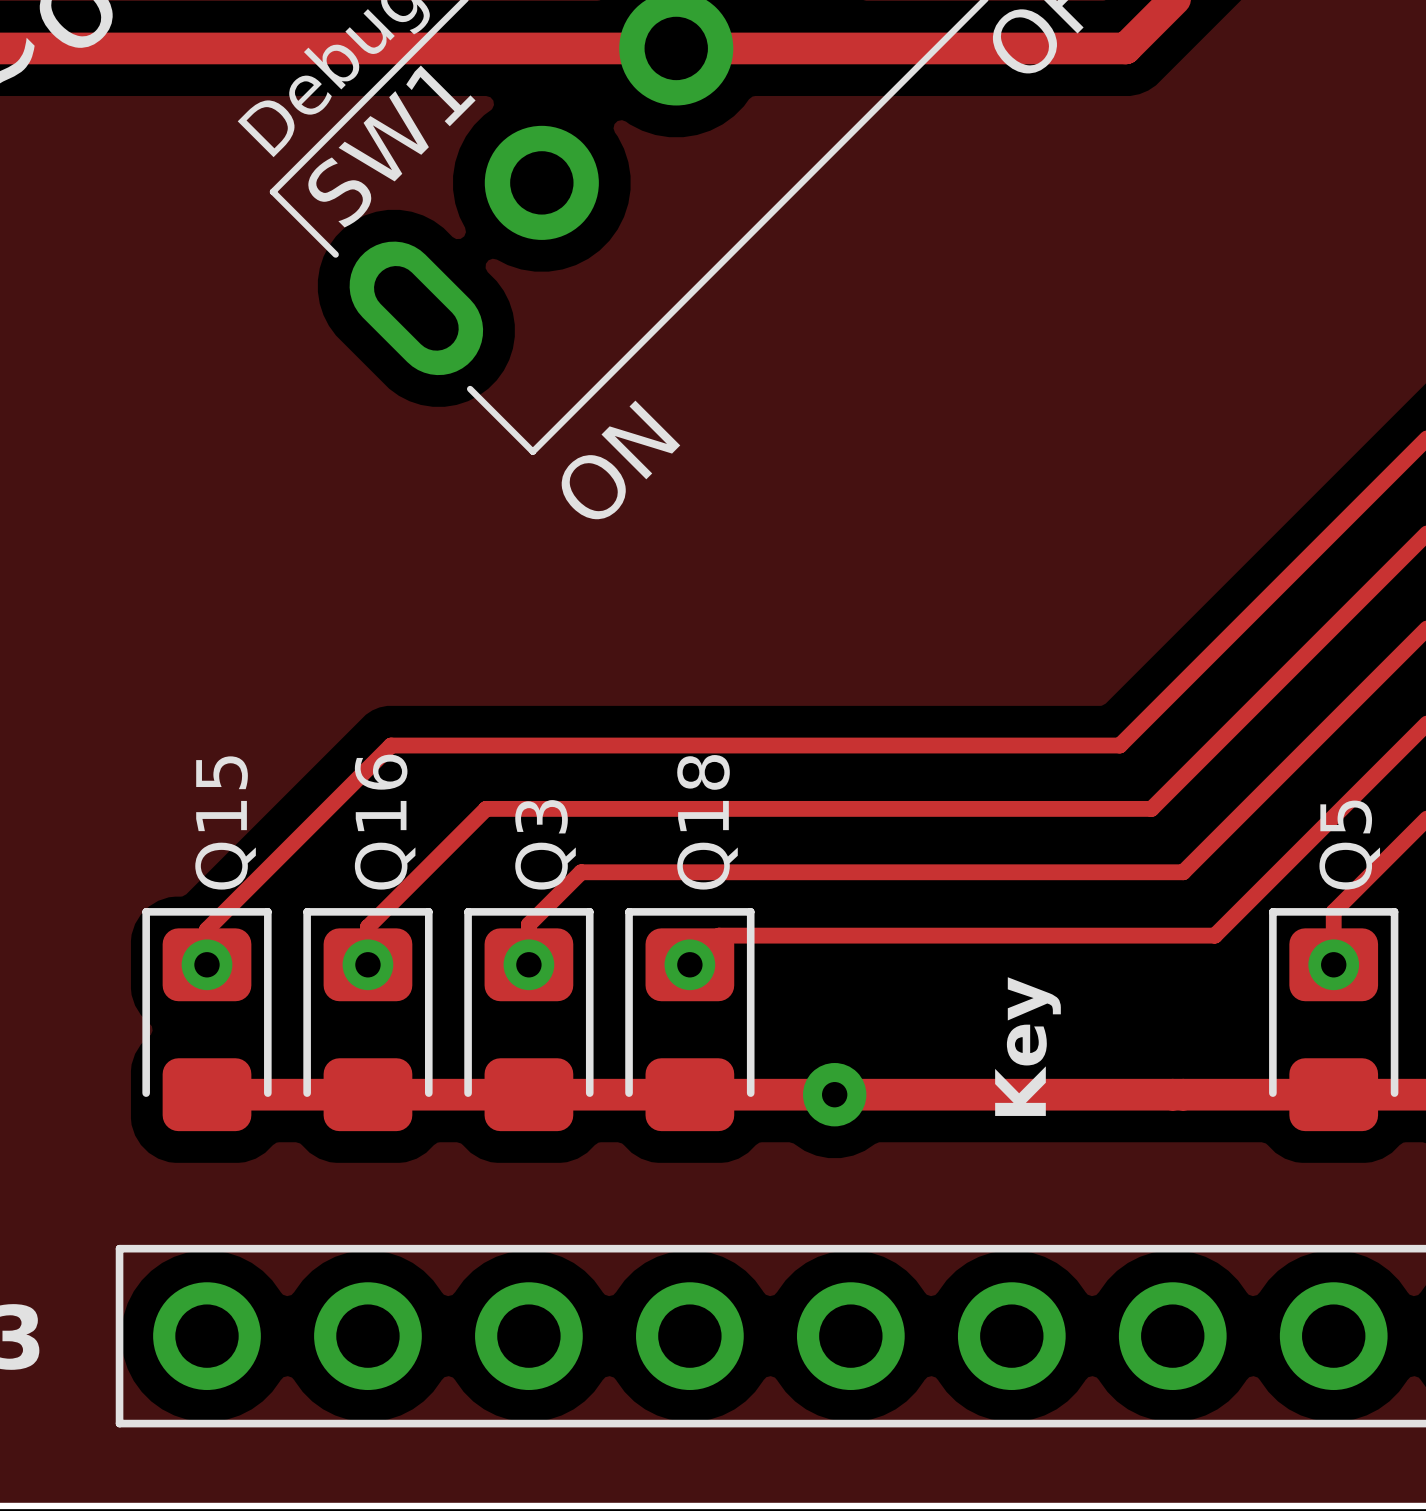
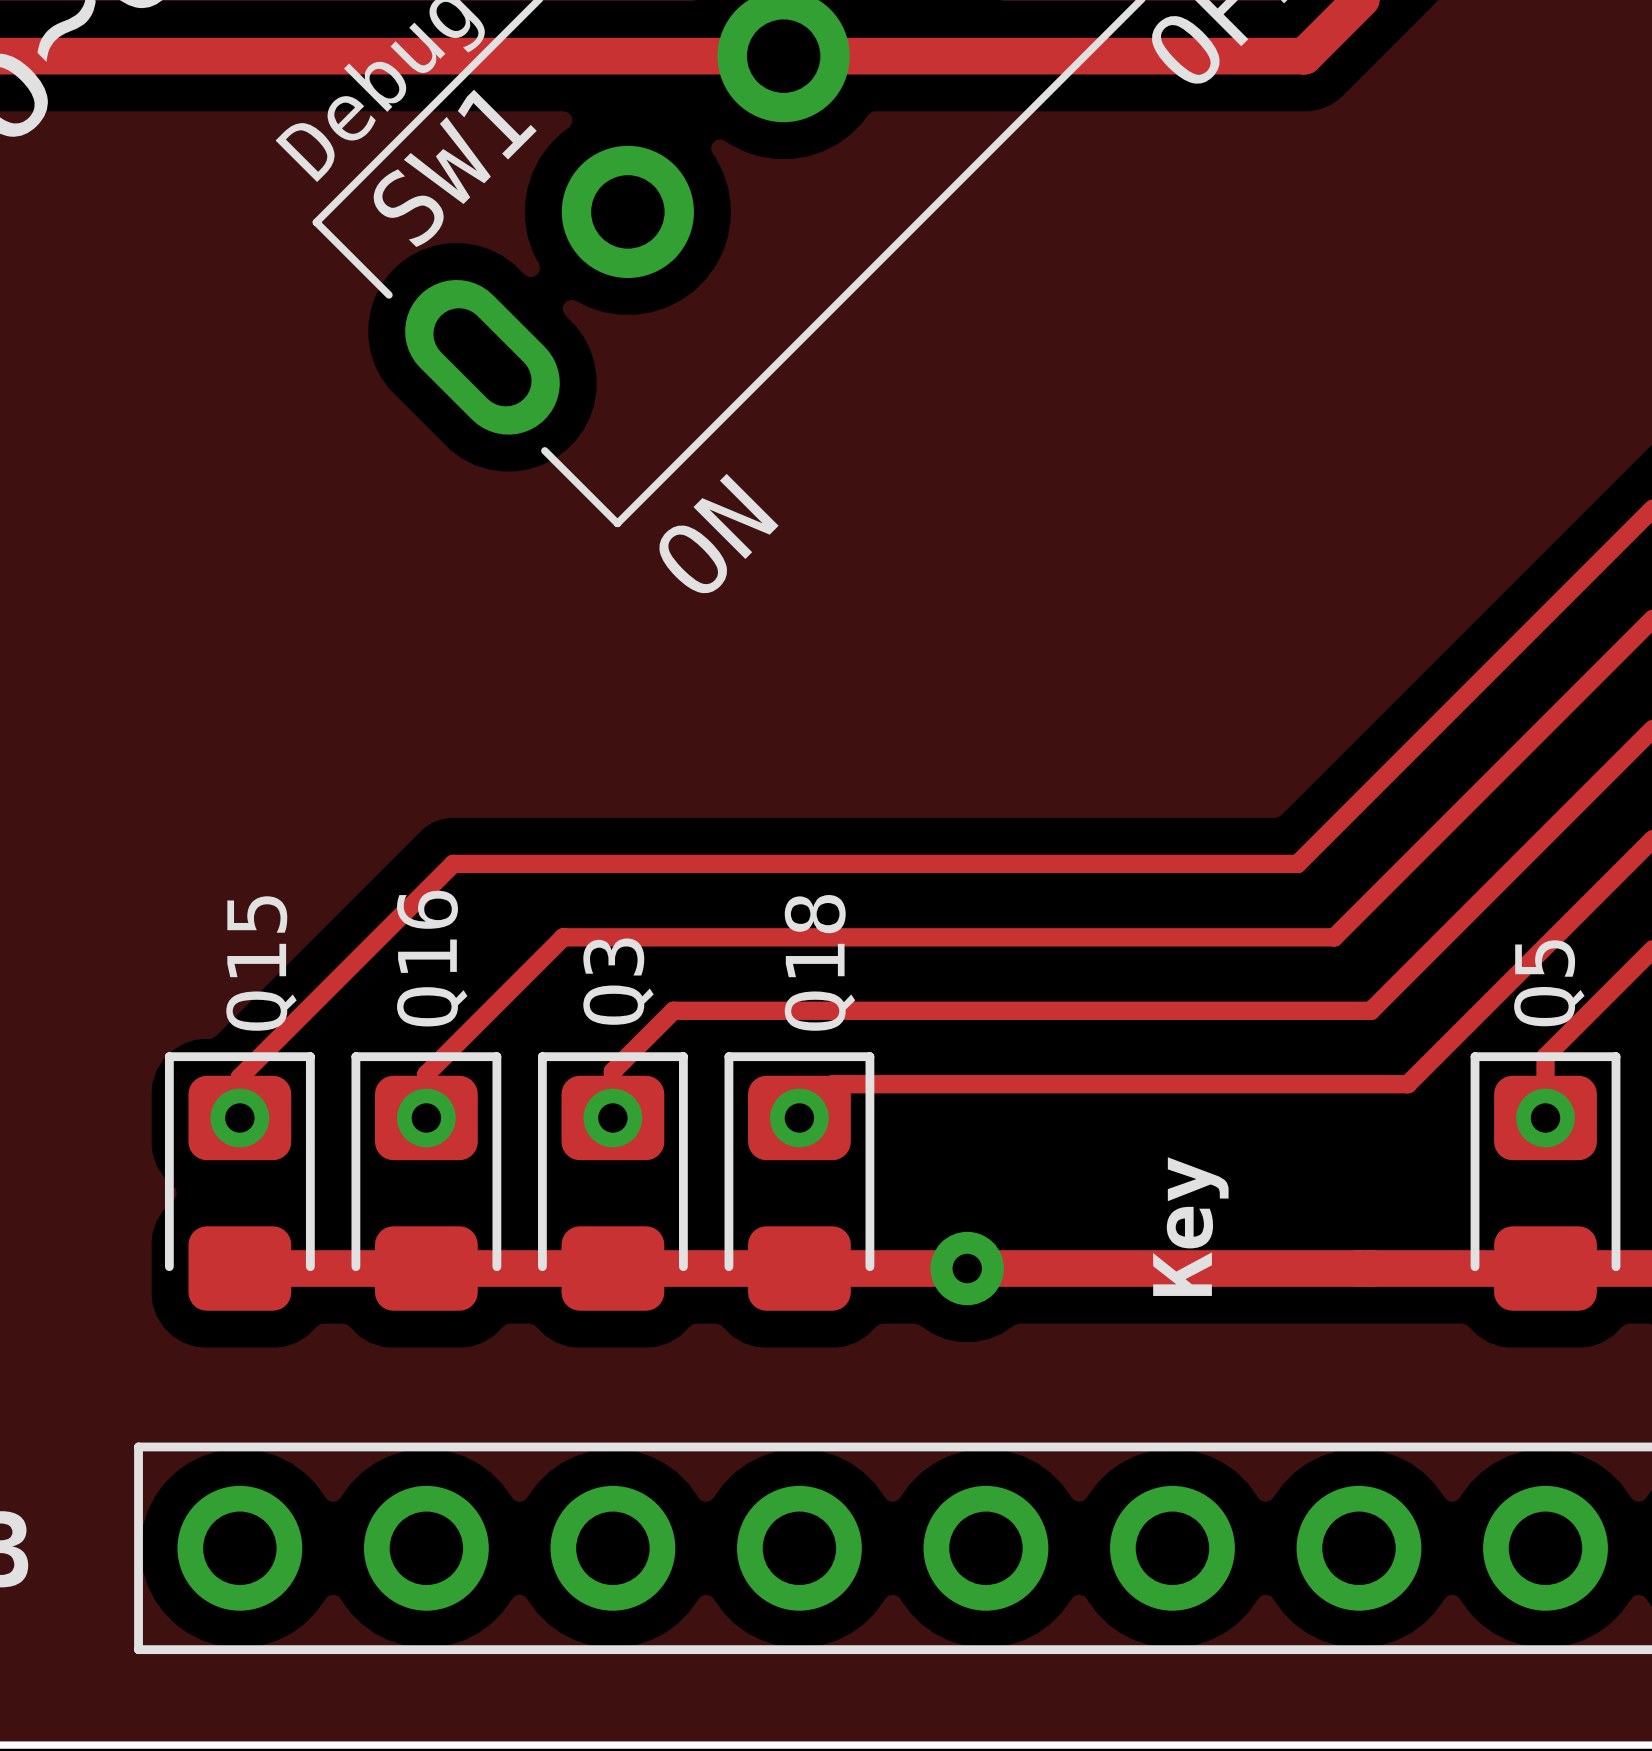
text position: Q16 (385, 822) -> Q16 (432, 958)
text position: Q3 (545, 844) -> Q3 (618, 981)
text position: Q5 (1349, 845) -> Q5 (1549, 983)

